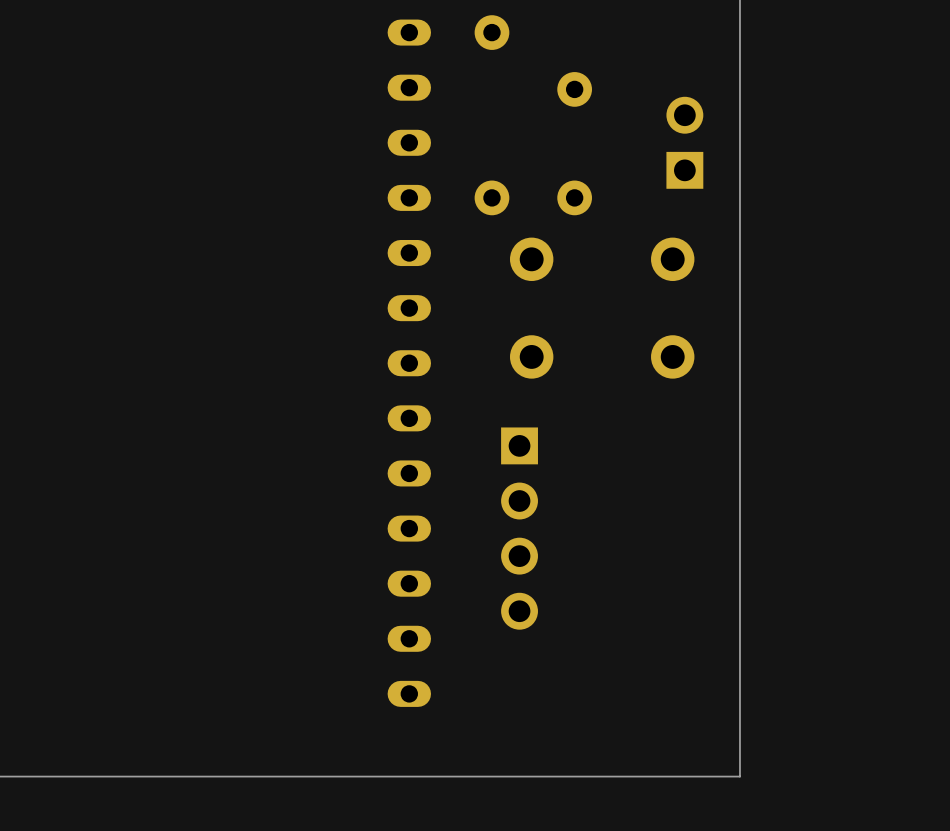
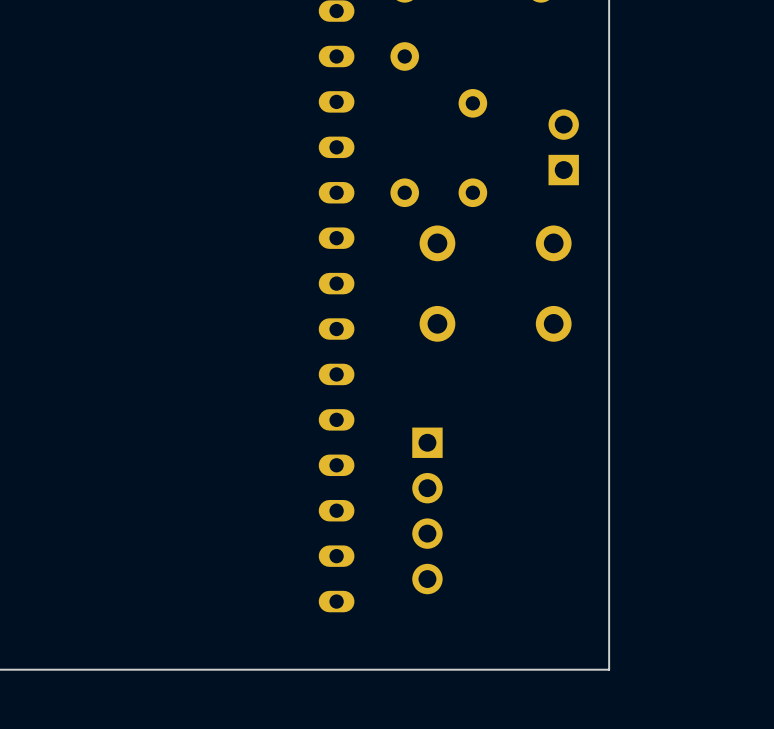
part position: (519, 528) -> (427, 510)

